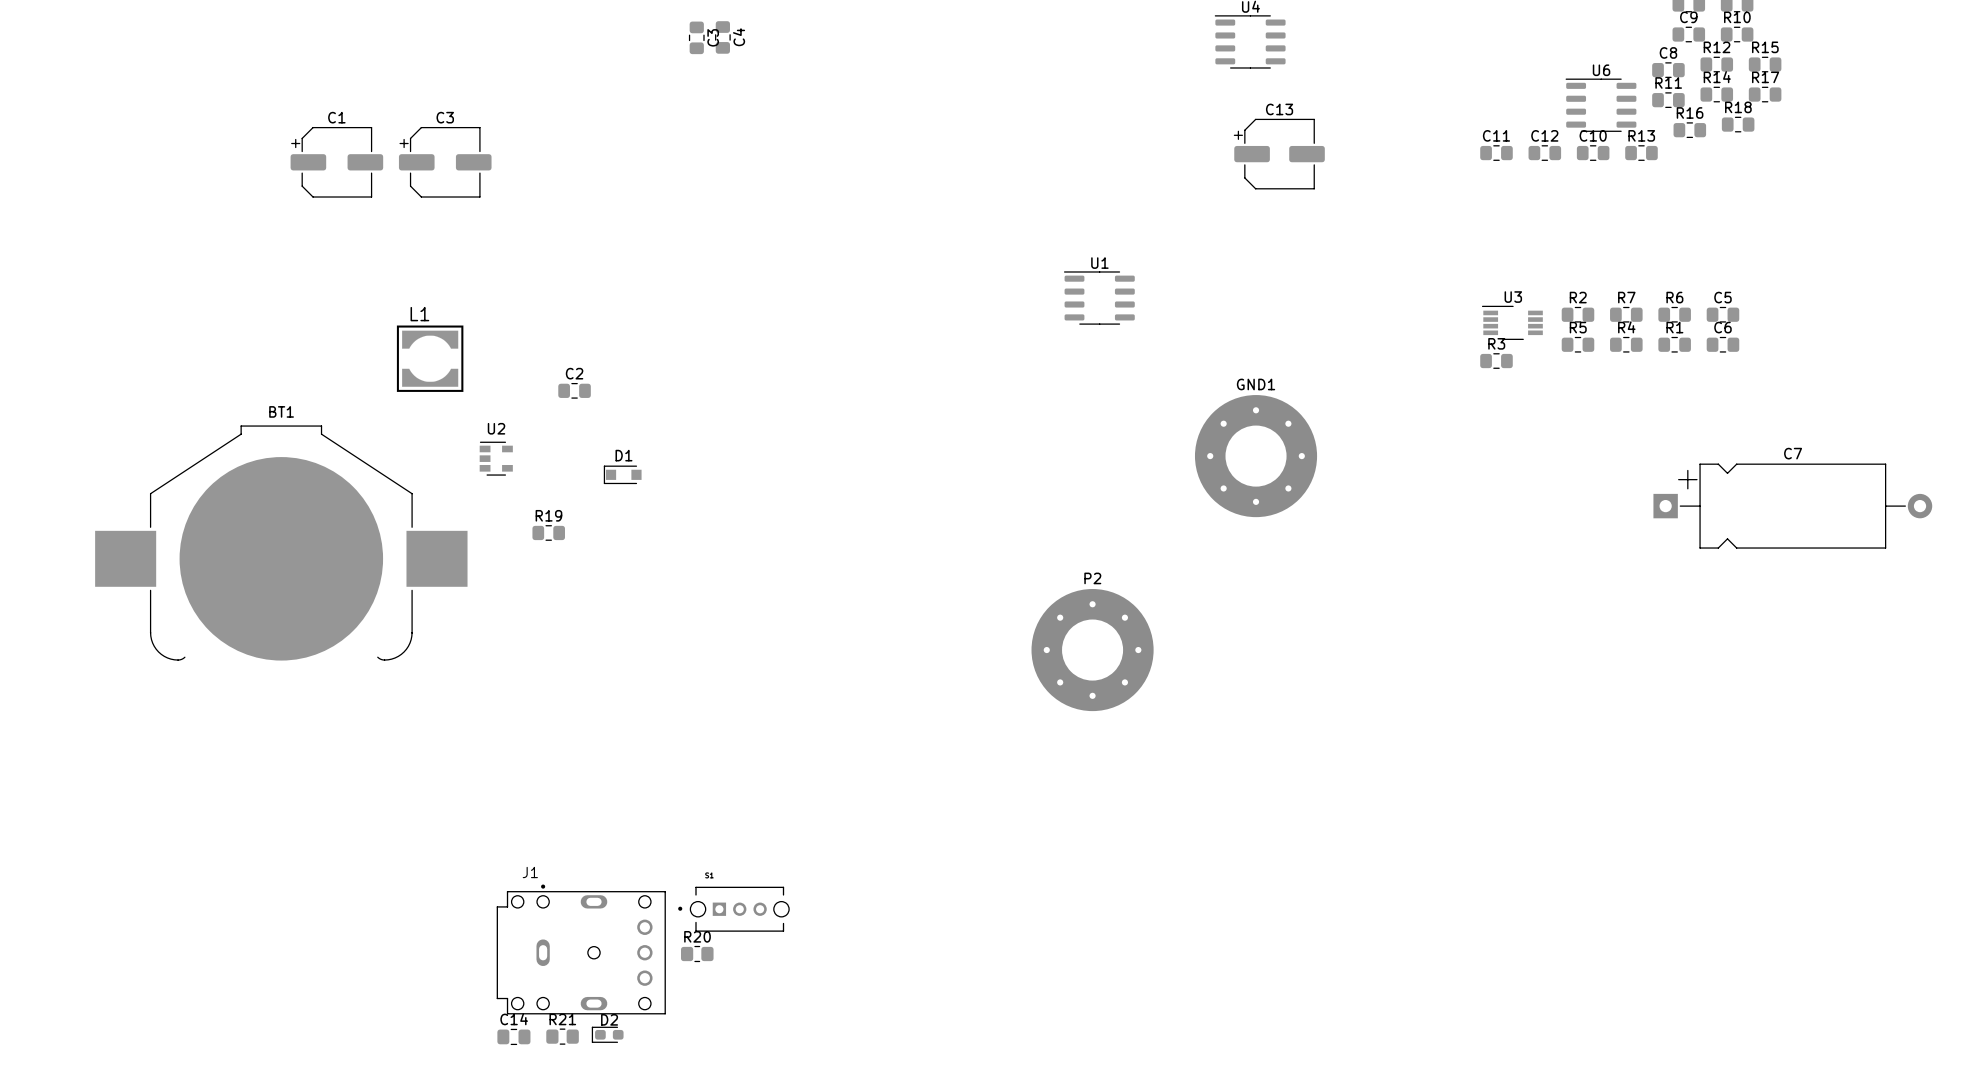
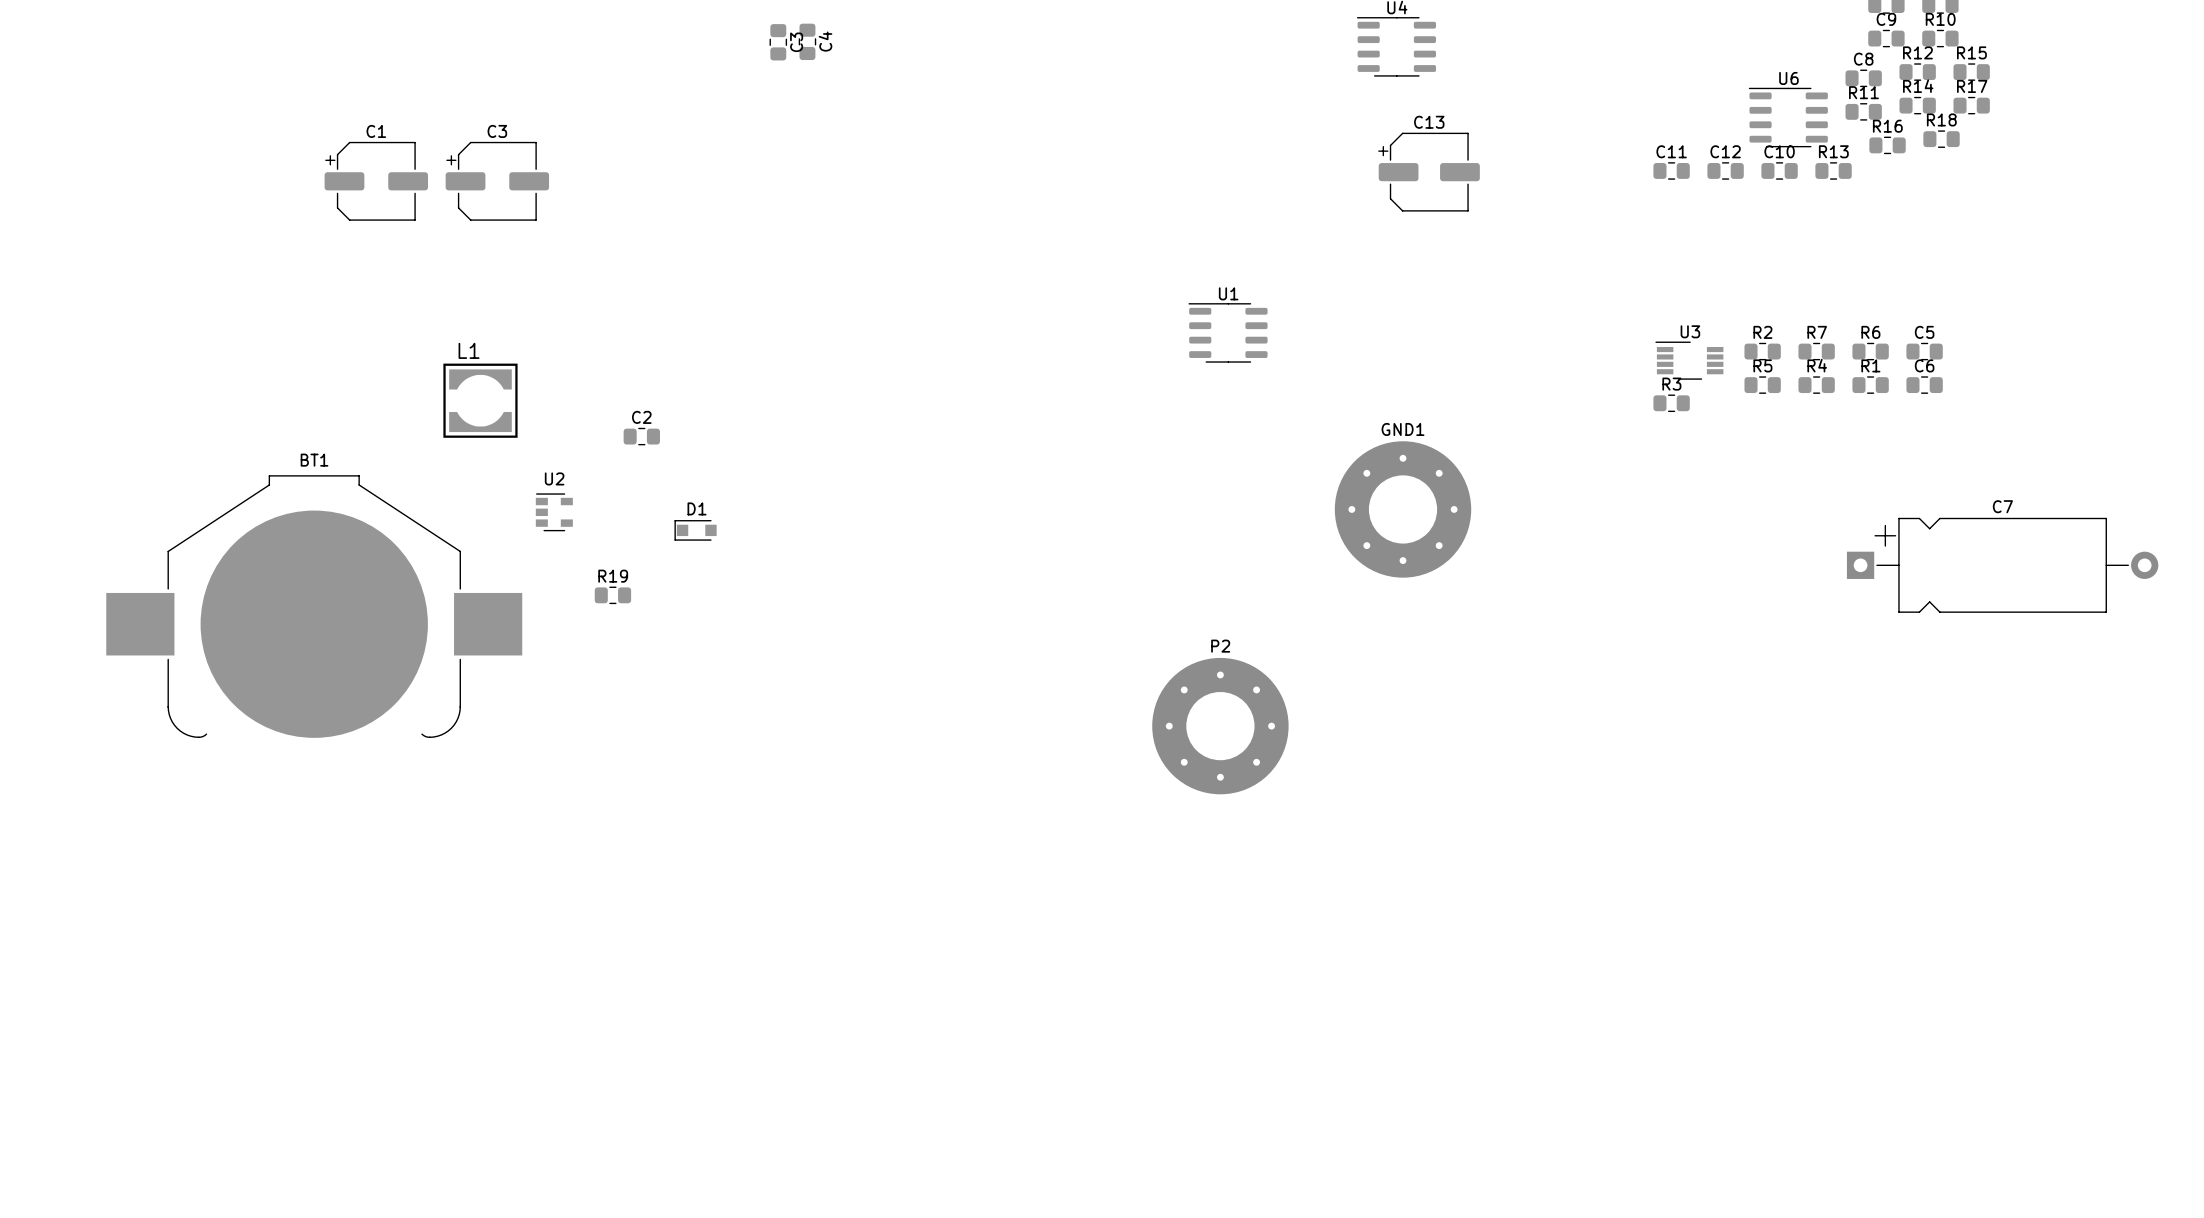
part: (733, 909) -> none
J1: (581, 949) -> none
R20: (697, 954) -> none
D2: (607, 1034) -> none
C14: (513, 1036) -> none
R21: (562, 1036) -> none

